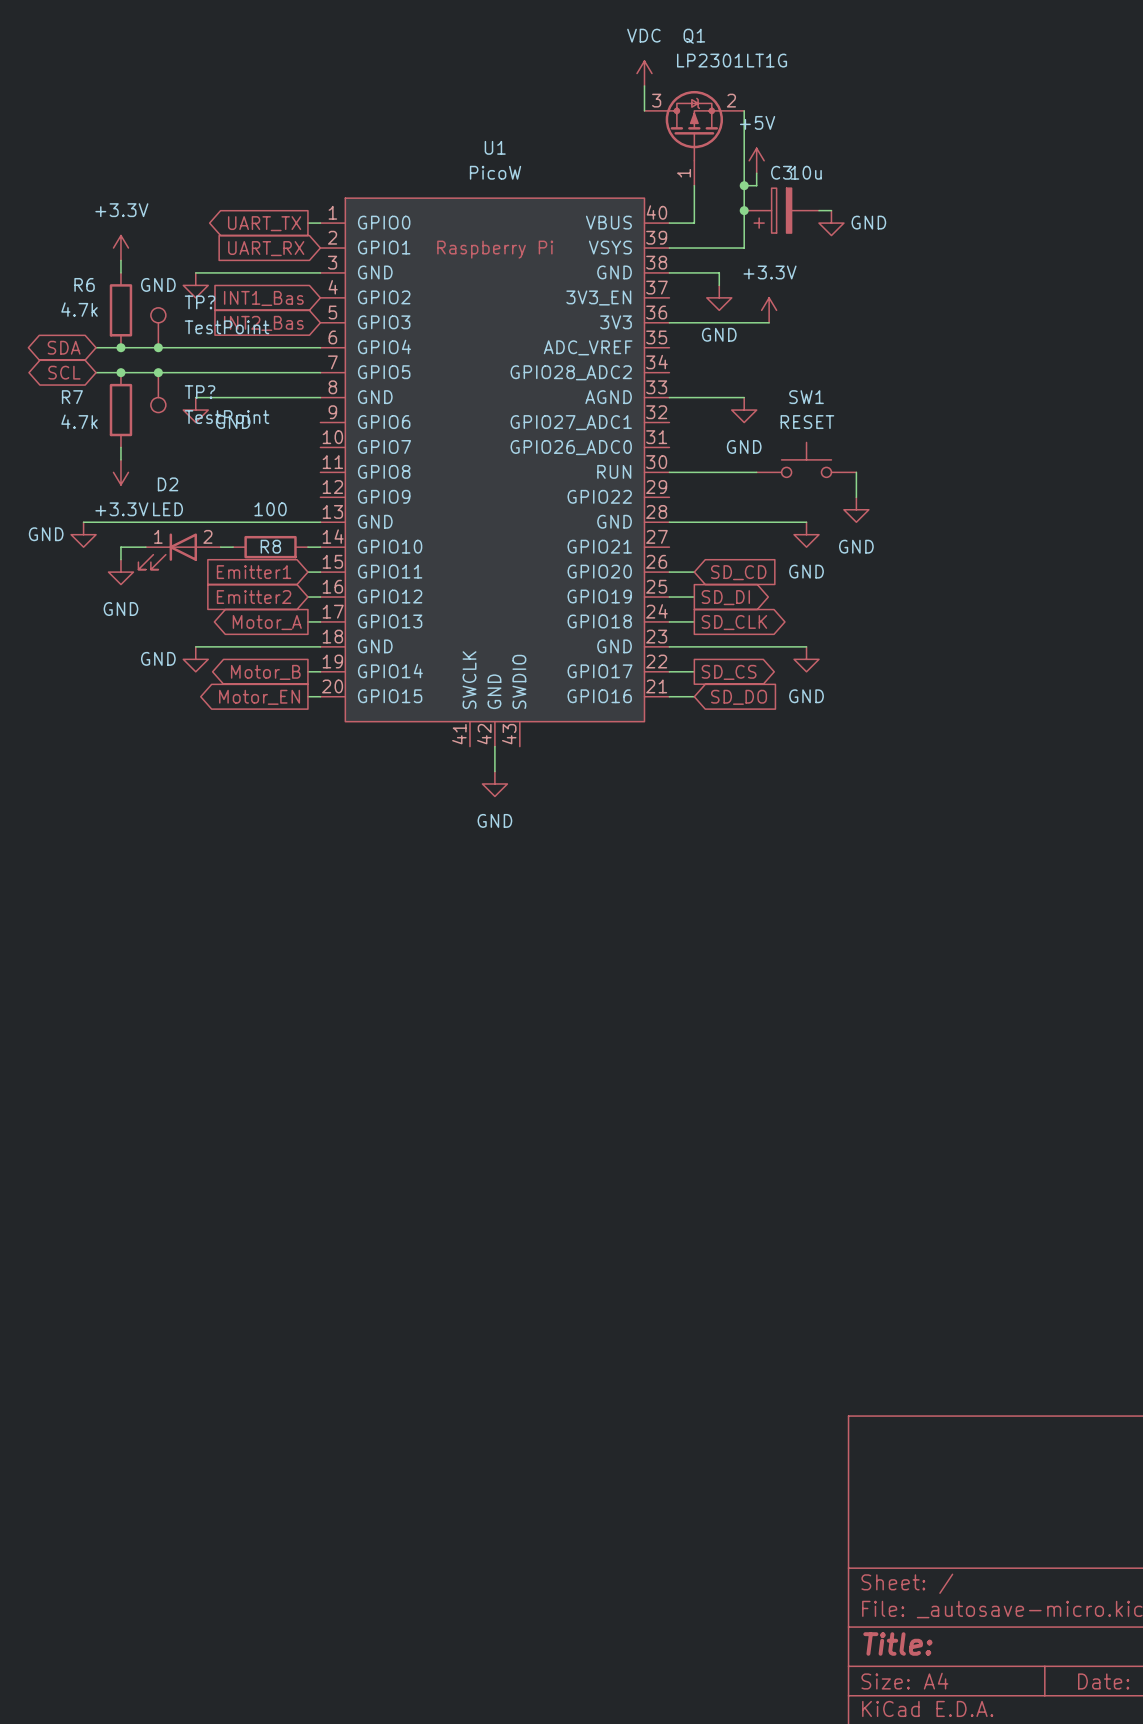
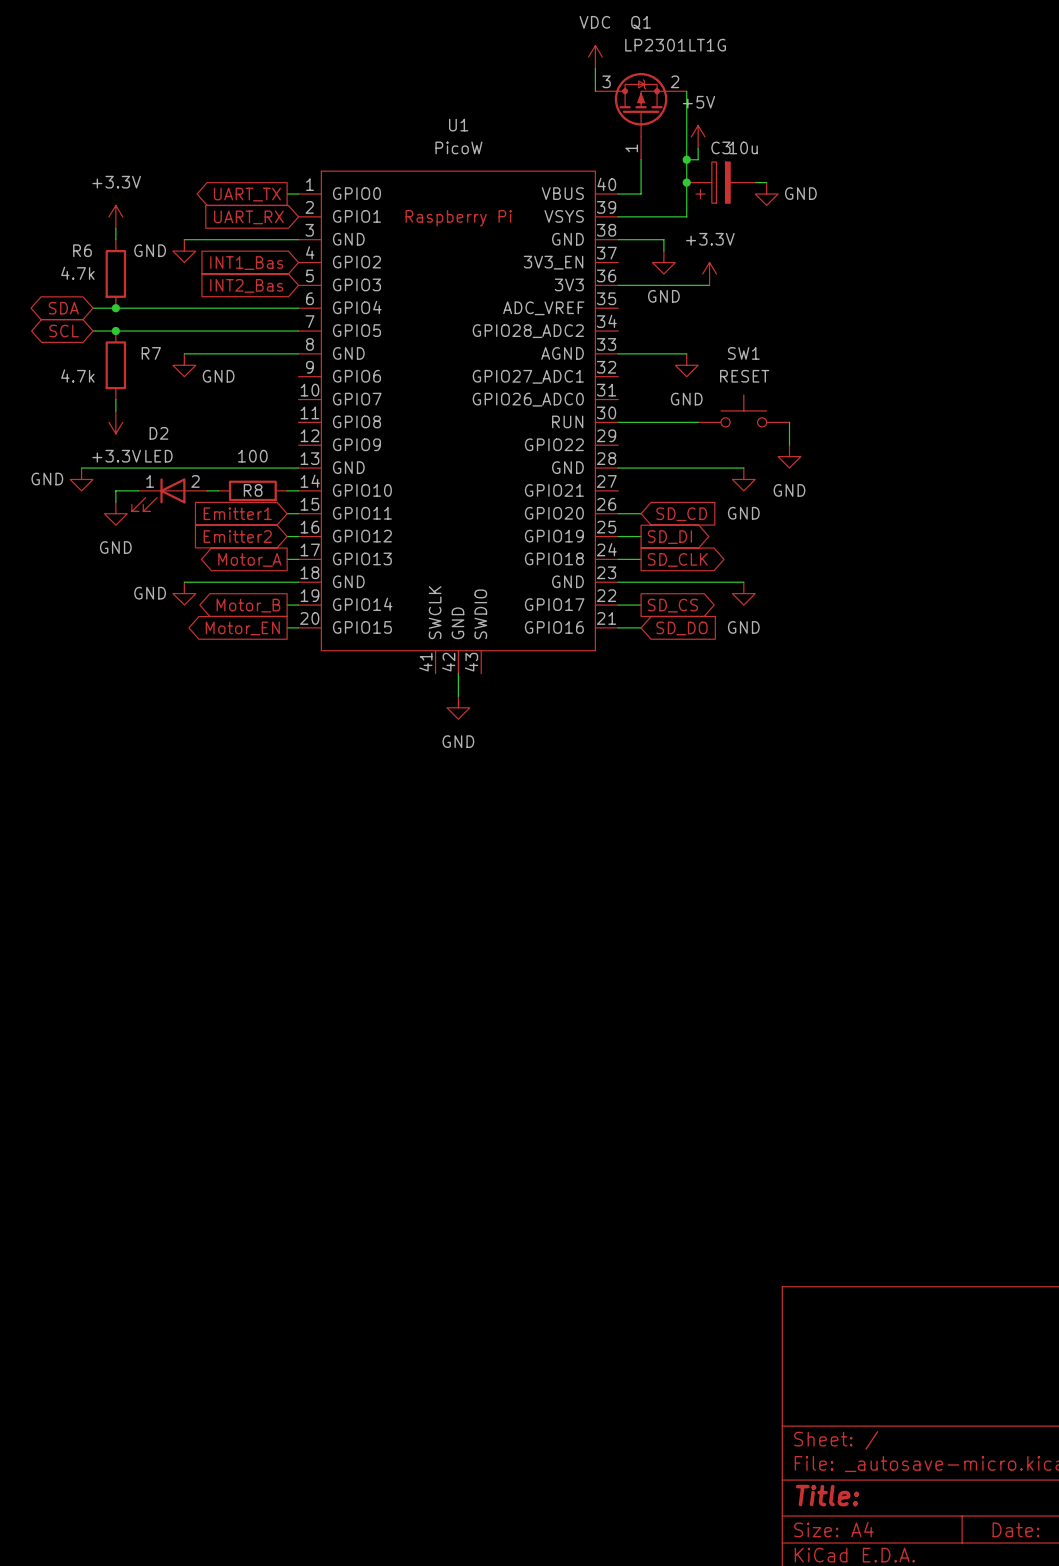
TP?: TestPoint (158, 327) -> none
junction: (158, 347) -> none
junction: (158, 372) -> none
TP?: TestPoint (158, 392) -> none
R7 name position: R7 (72, 397) -> R7 (151, 353)

